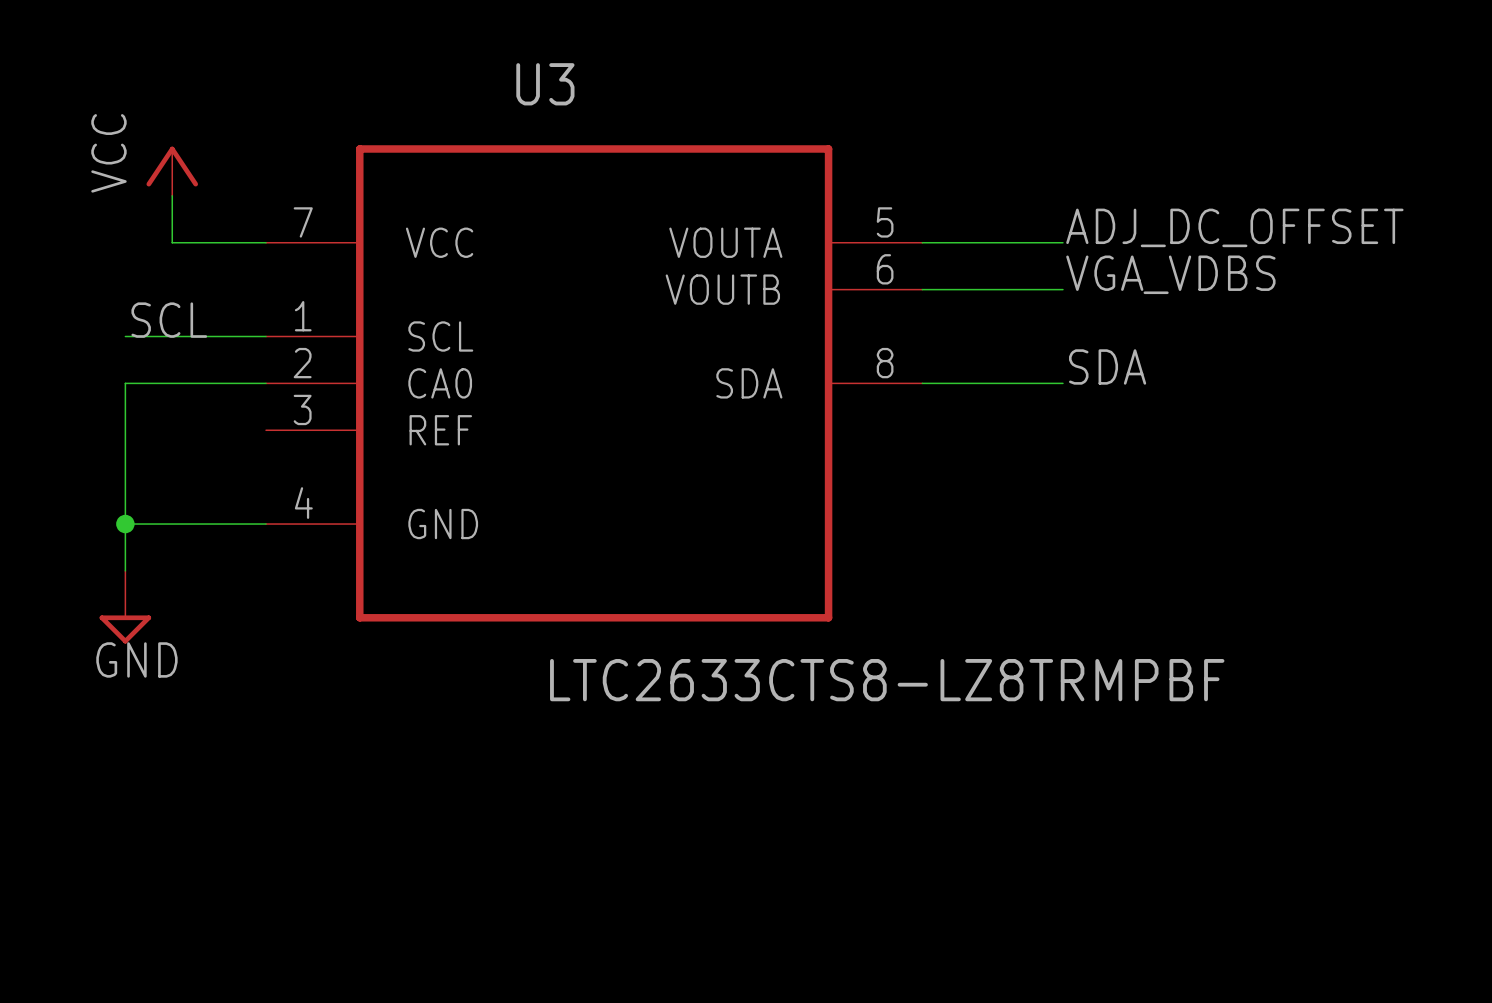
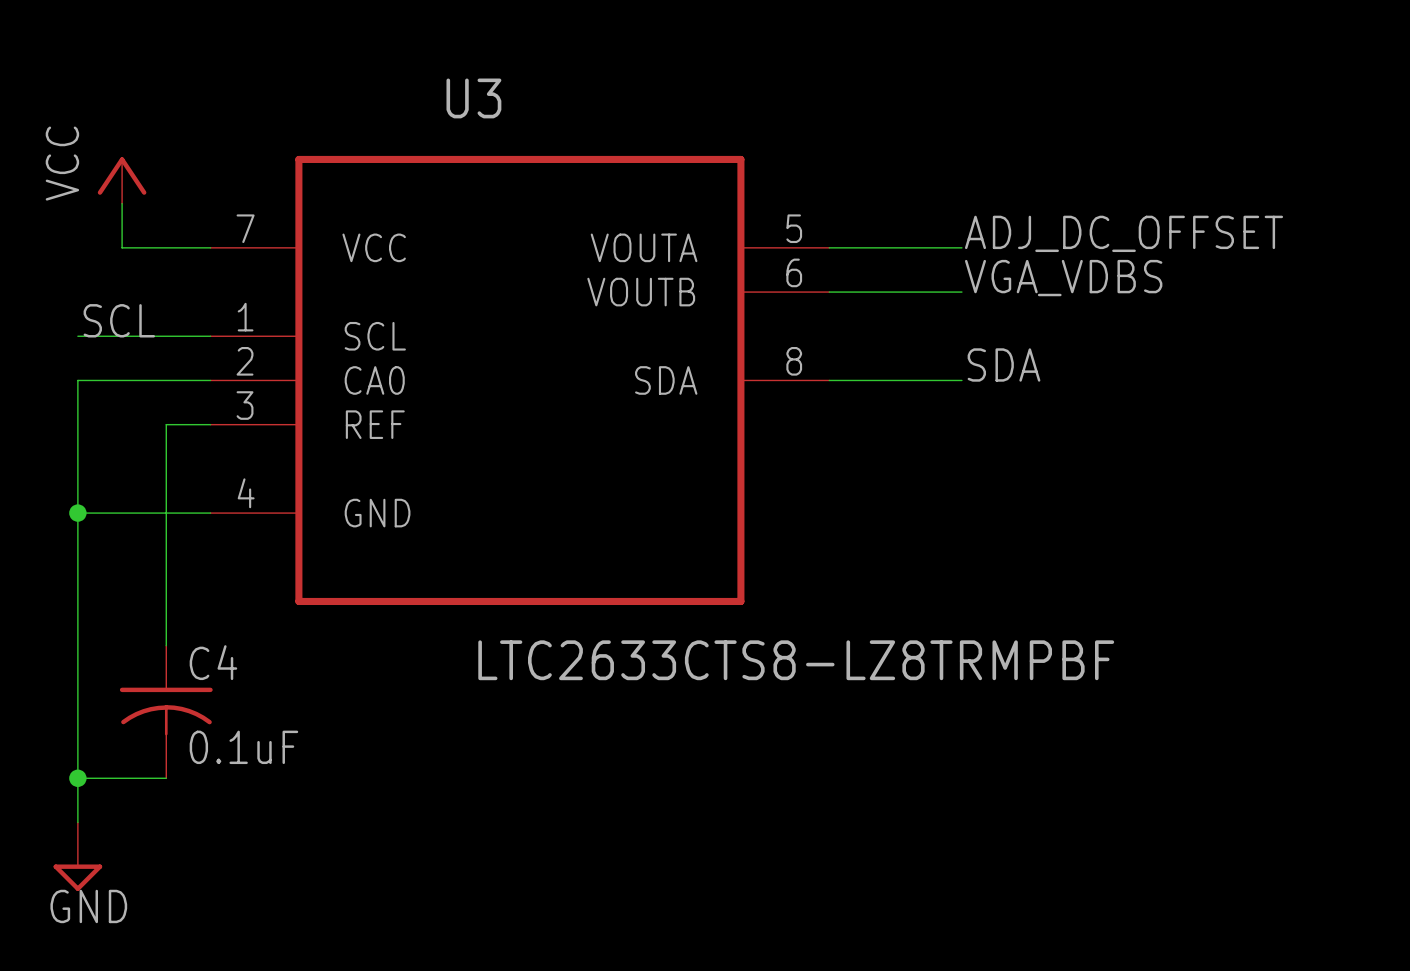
wire: none -> (210, 424) (166, 424) (166, 645)
wire: none -> (77, 557) (77, 822)
power symbol position: GND (125, 607) -> GND (77, 856)
C4: none -> 0.1uF (166, 711)
wire: none -> (77, 778) (166, 778)
junction: none -> (77, 778)

